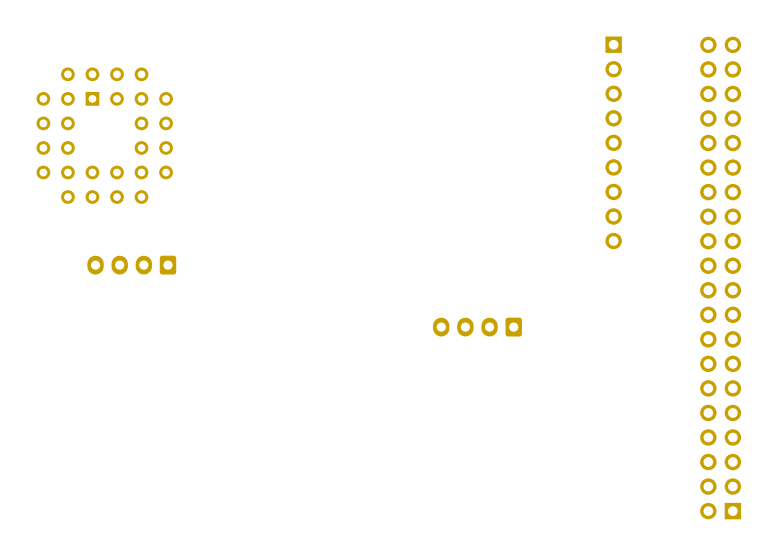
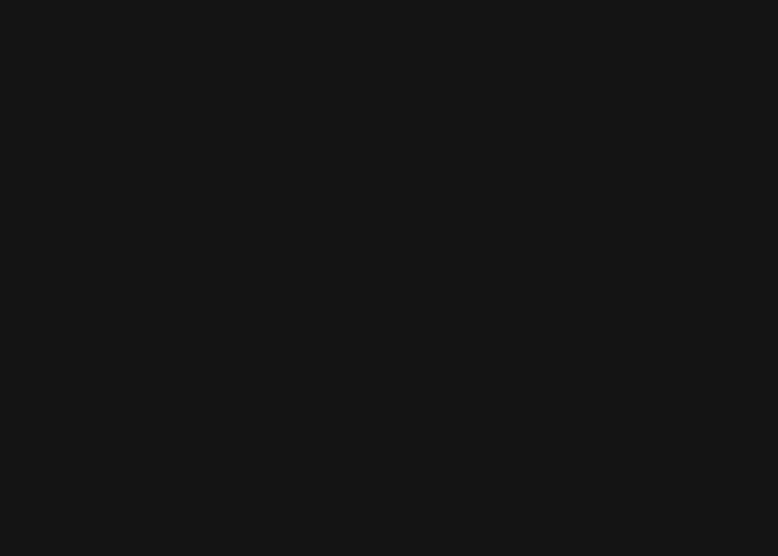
part: (104, 135) -> none
part: (613, 142) -> none
part: (131, 265) -> none
part: (720, 278) -> none
part: (477, 327) -> none

